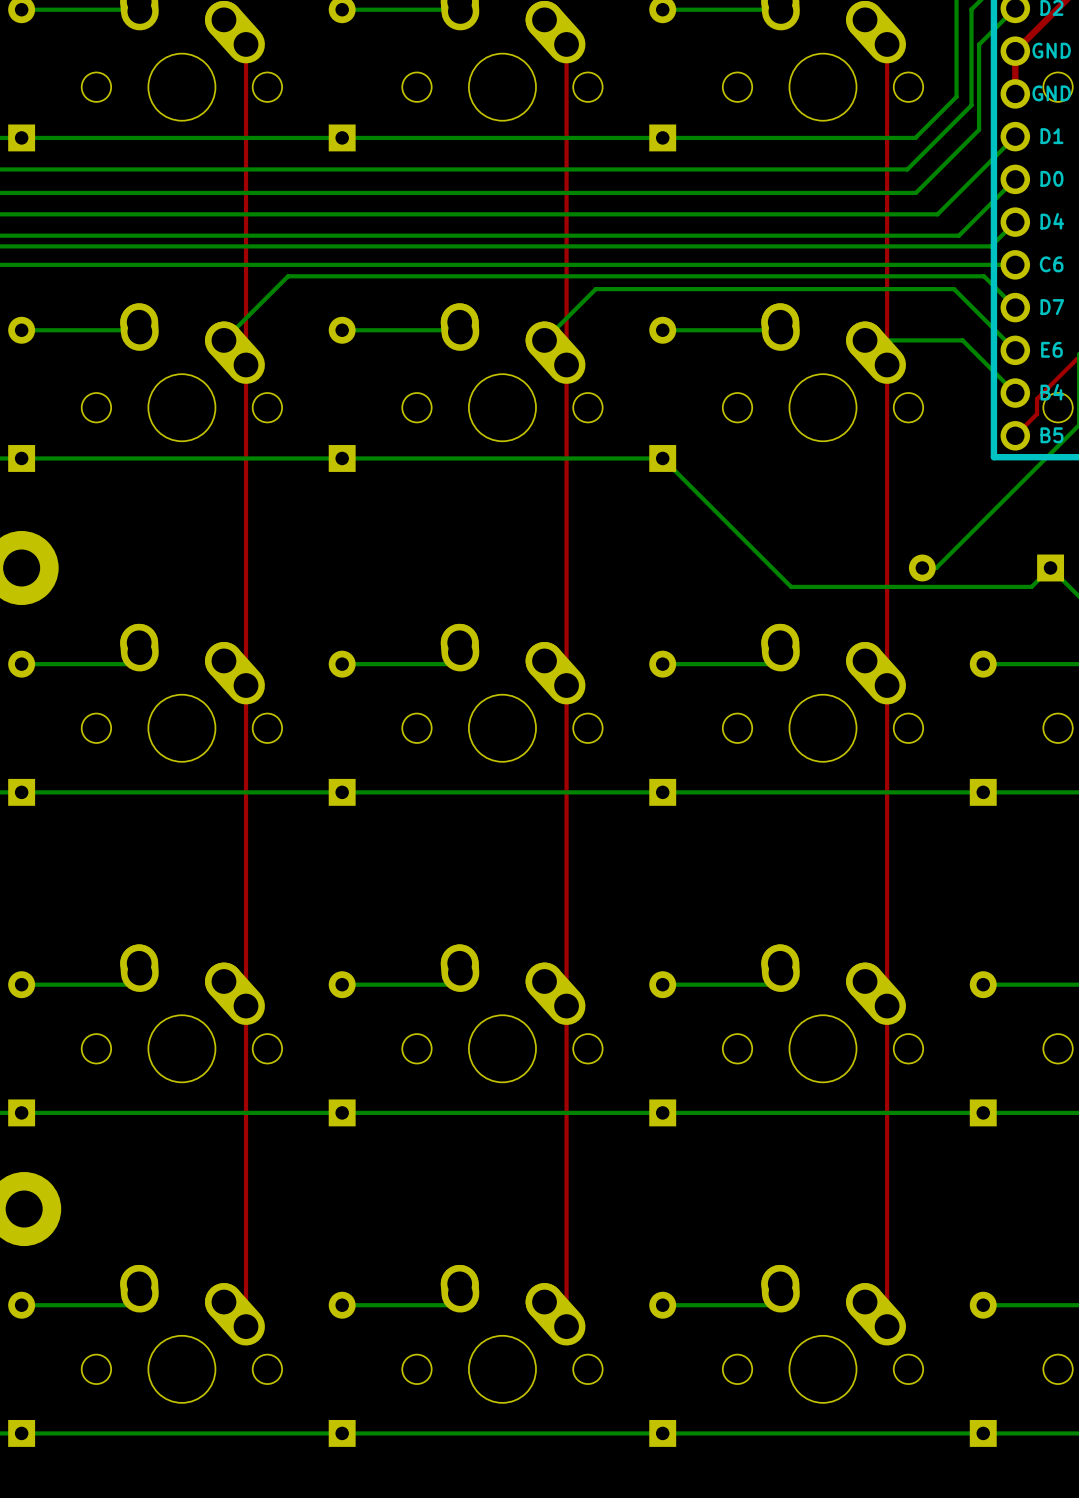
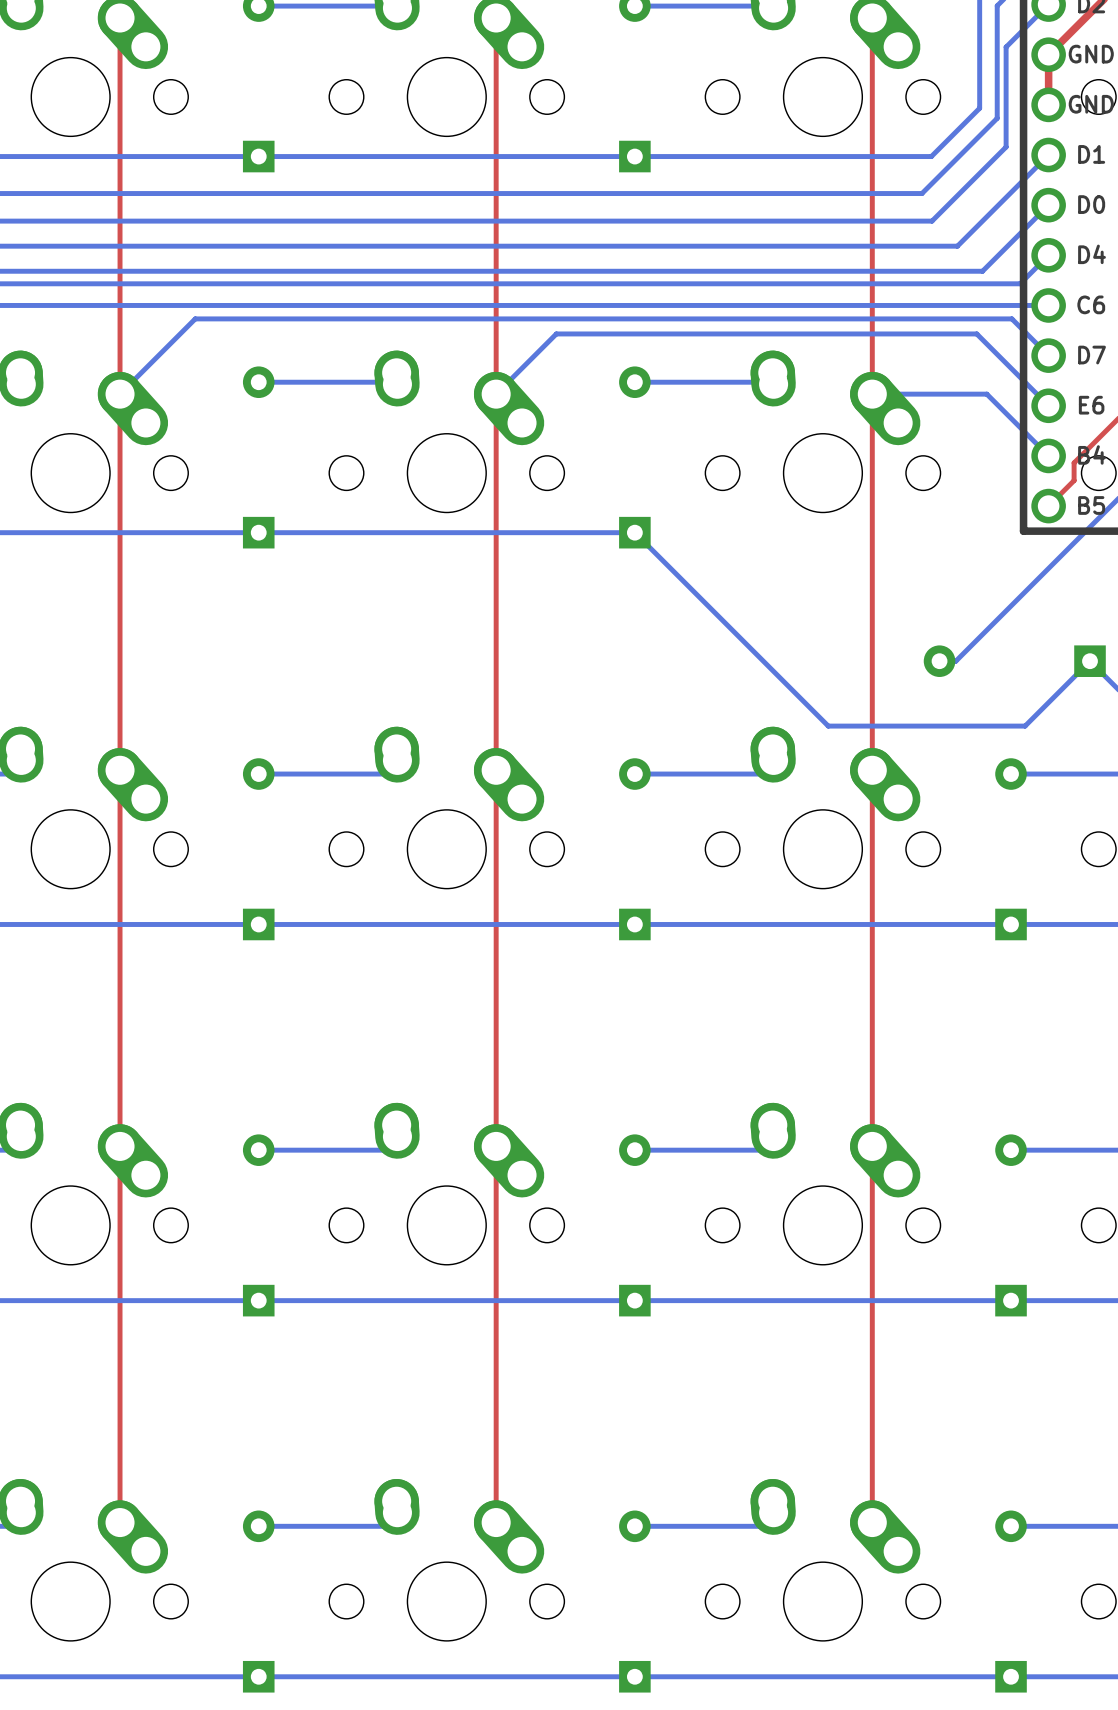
top track: (246, 44) (246, 1326) -> (120, 18) (120, 1522)
top track: (566, 44) (566, 1326) -> (496, 18) (496, 1522)
top track: (887, 44) (887, 1326) -> (872, 18) (872, 1522)
bottom track: (1031, 586) (791, 586) -> (1067, 683) (1025, 726) (828, 726) (785, 683)

